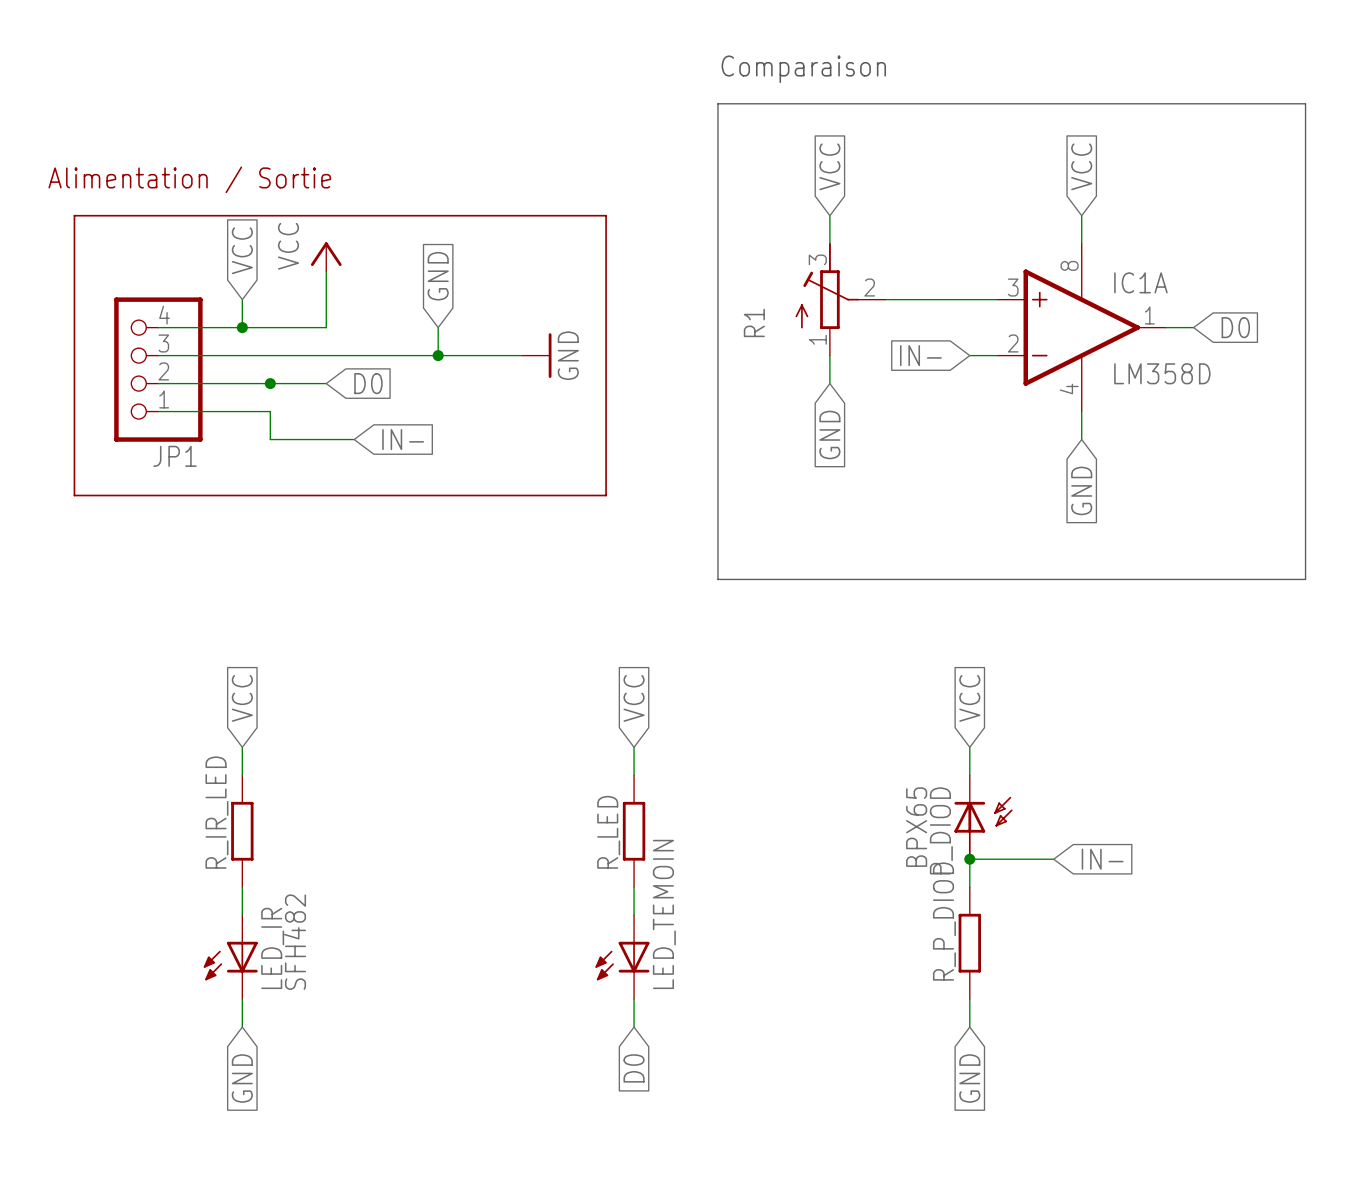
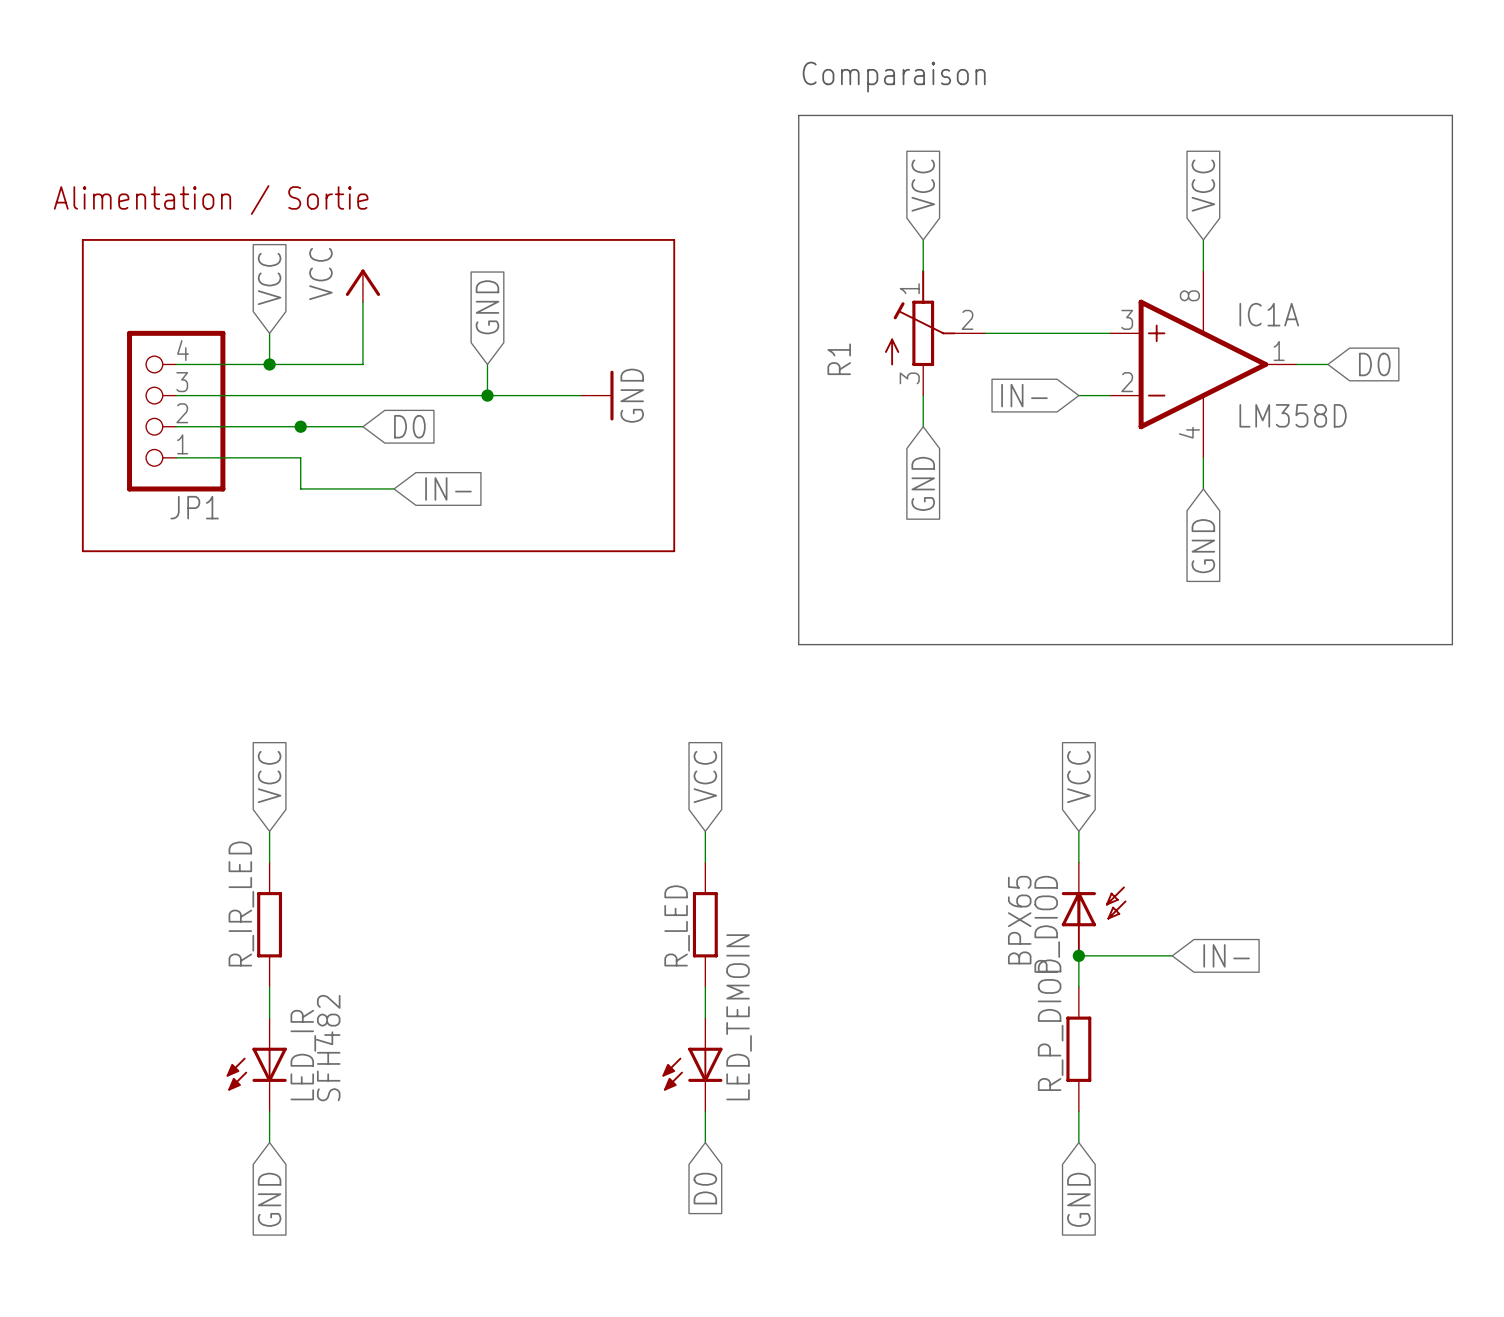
R1 pin number: 3 (817, 259) -> 1 (909, 288)
R1 pin number: 1 (817, 339) -> 3 (909, 378)

